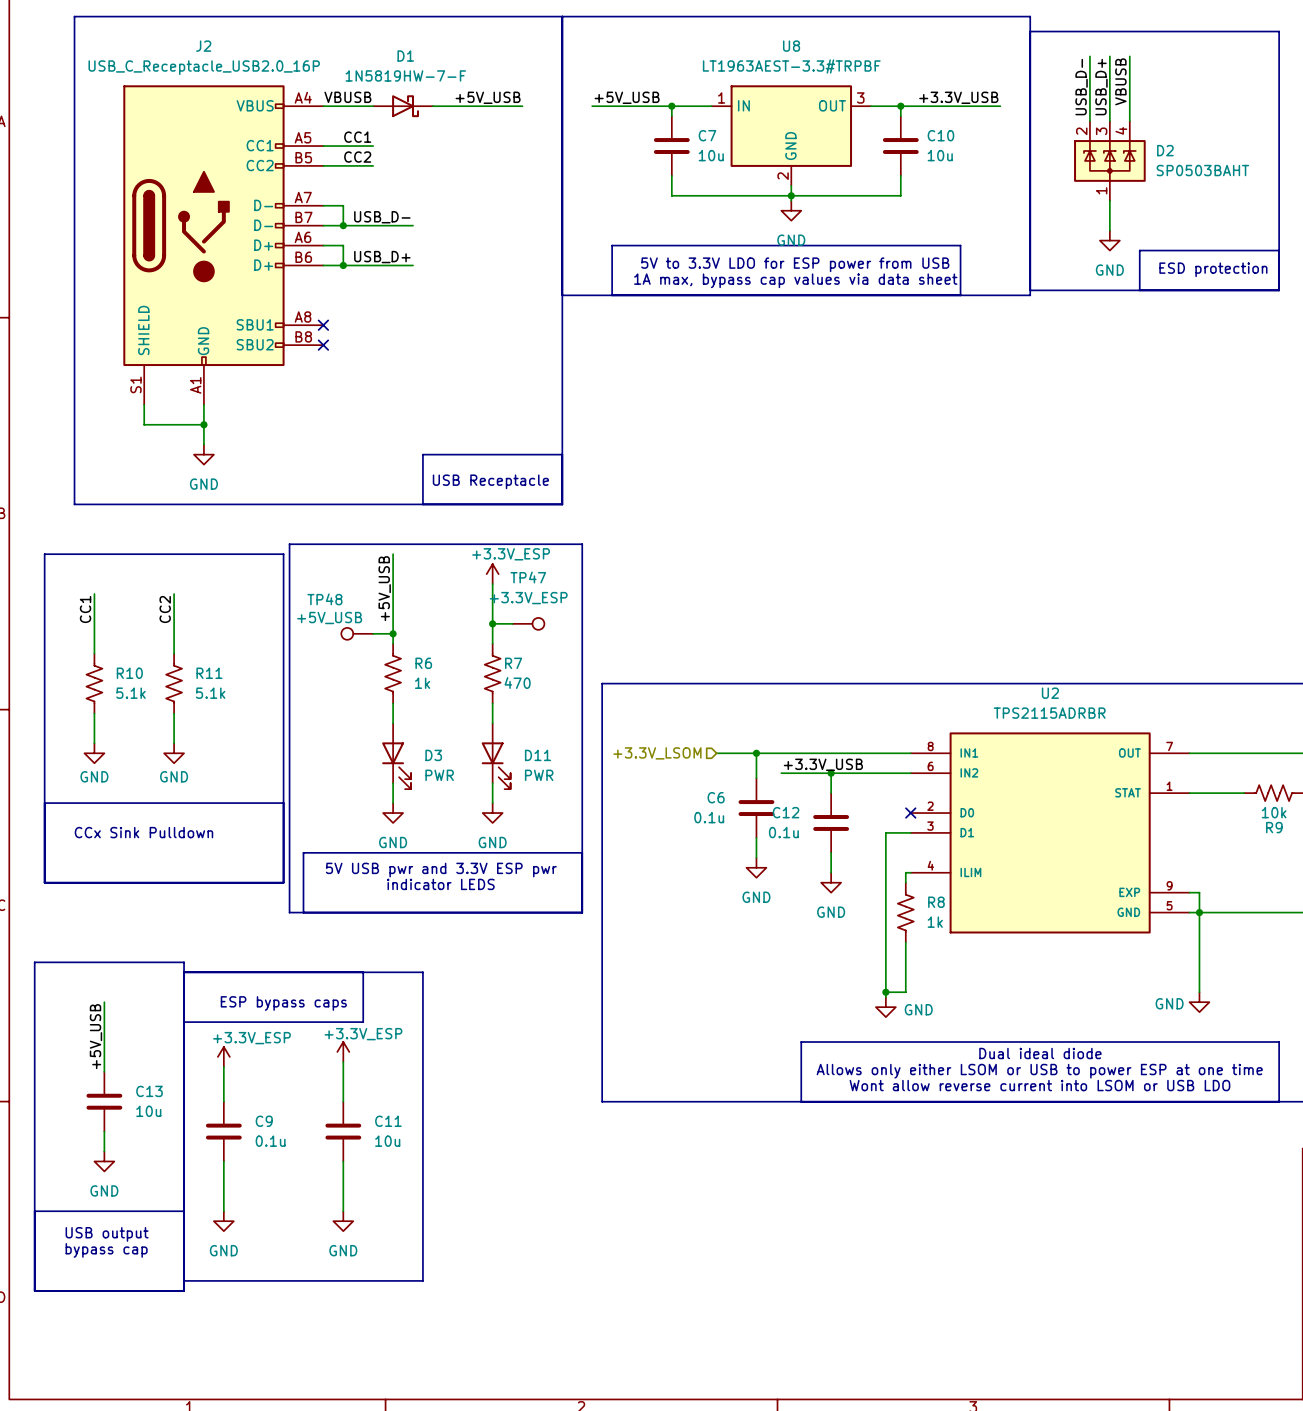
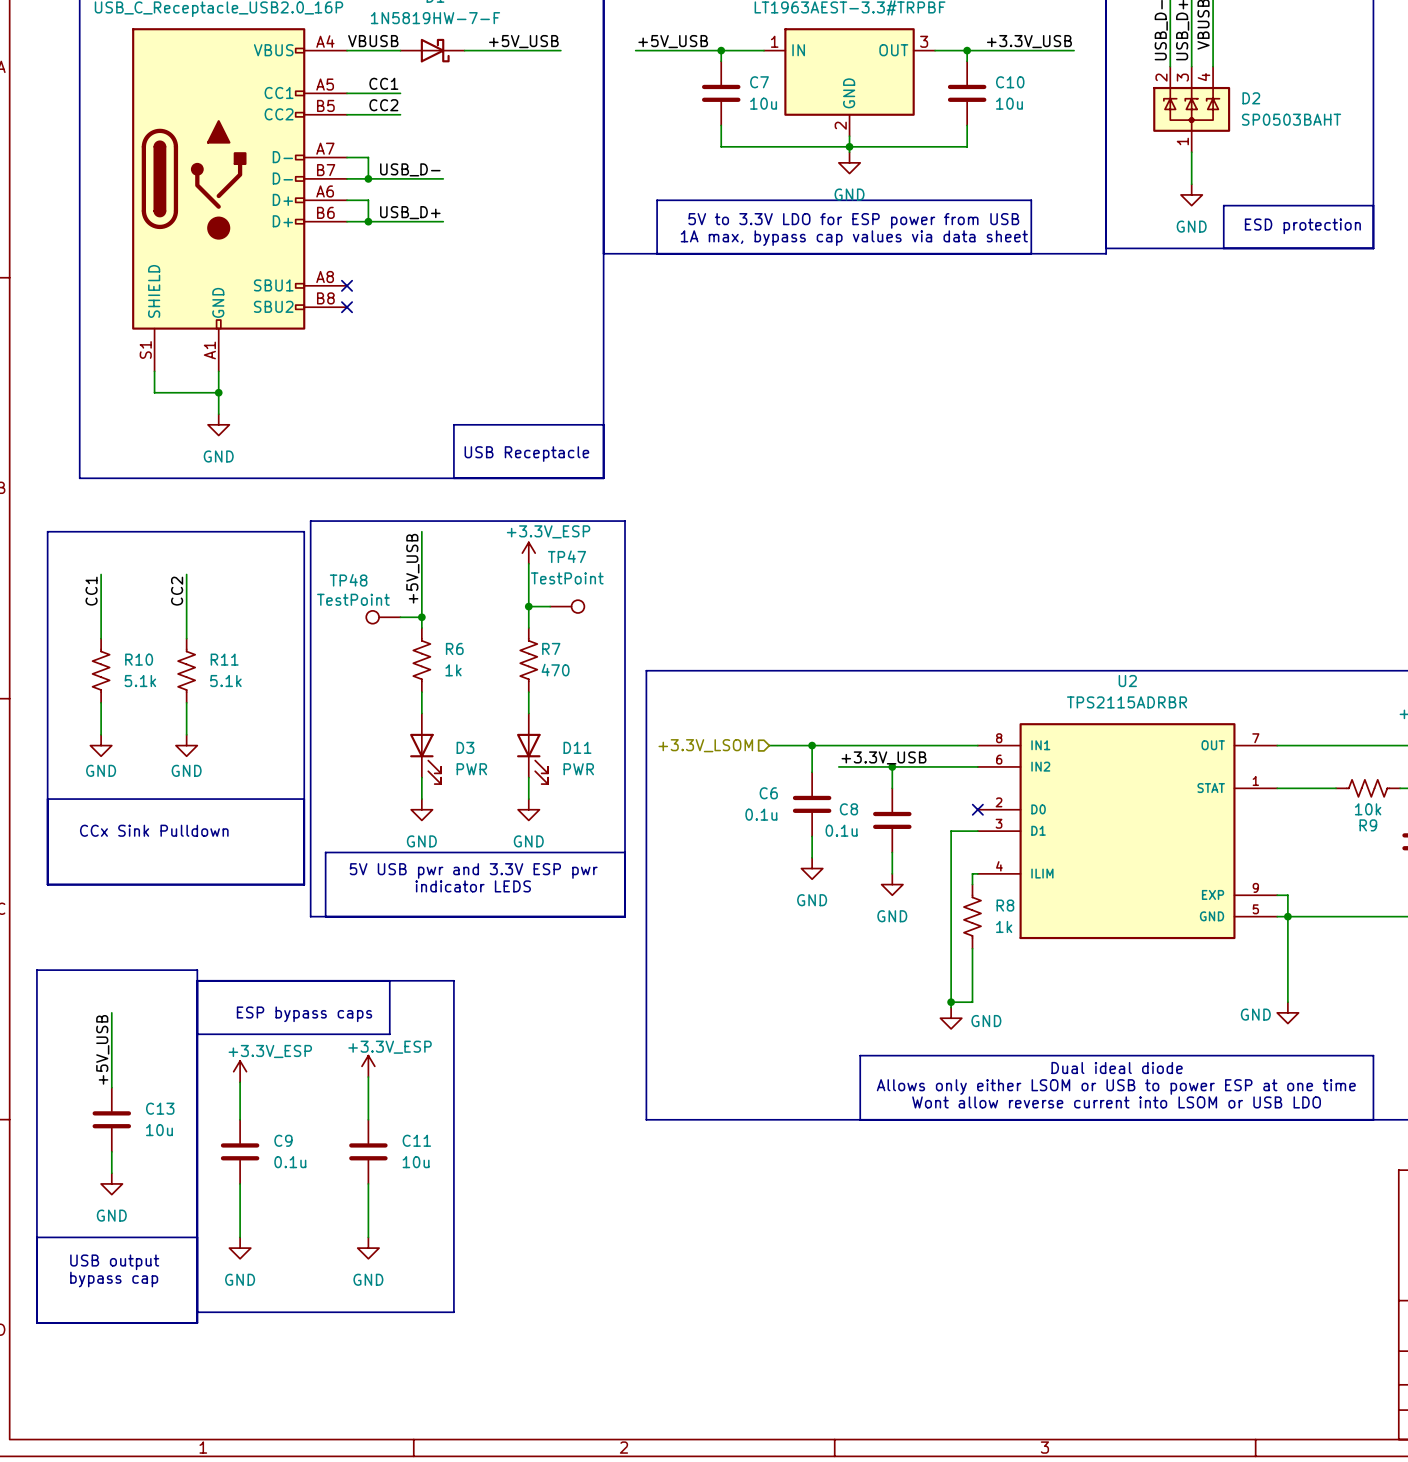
TP47 value: +3.3V_ESP (528, 598) -> TestPoint (567, 578)
TP48 value: +5V_USB (329, 618) -> TestPoint (353, 599)
C12 name: C12 (786, 812) -> C8 (848, 809)

